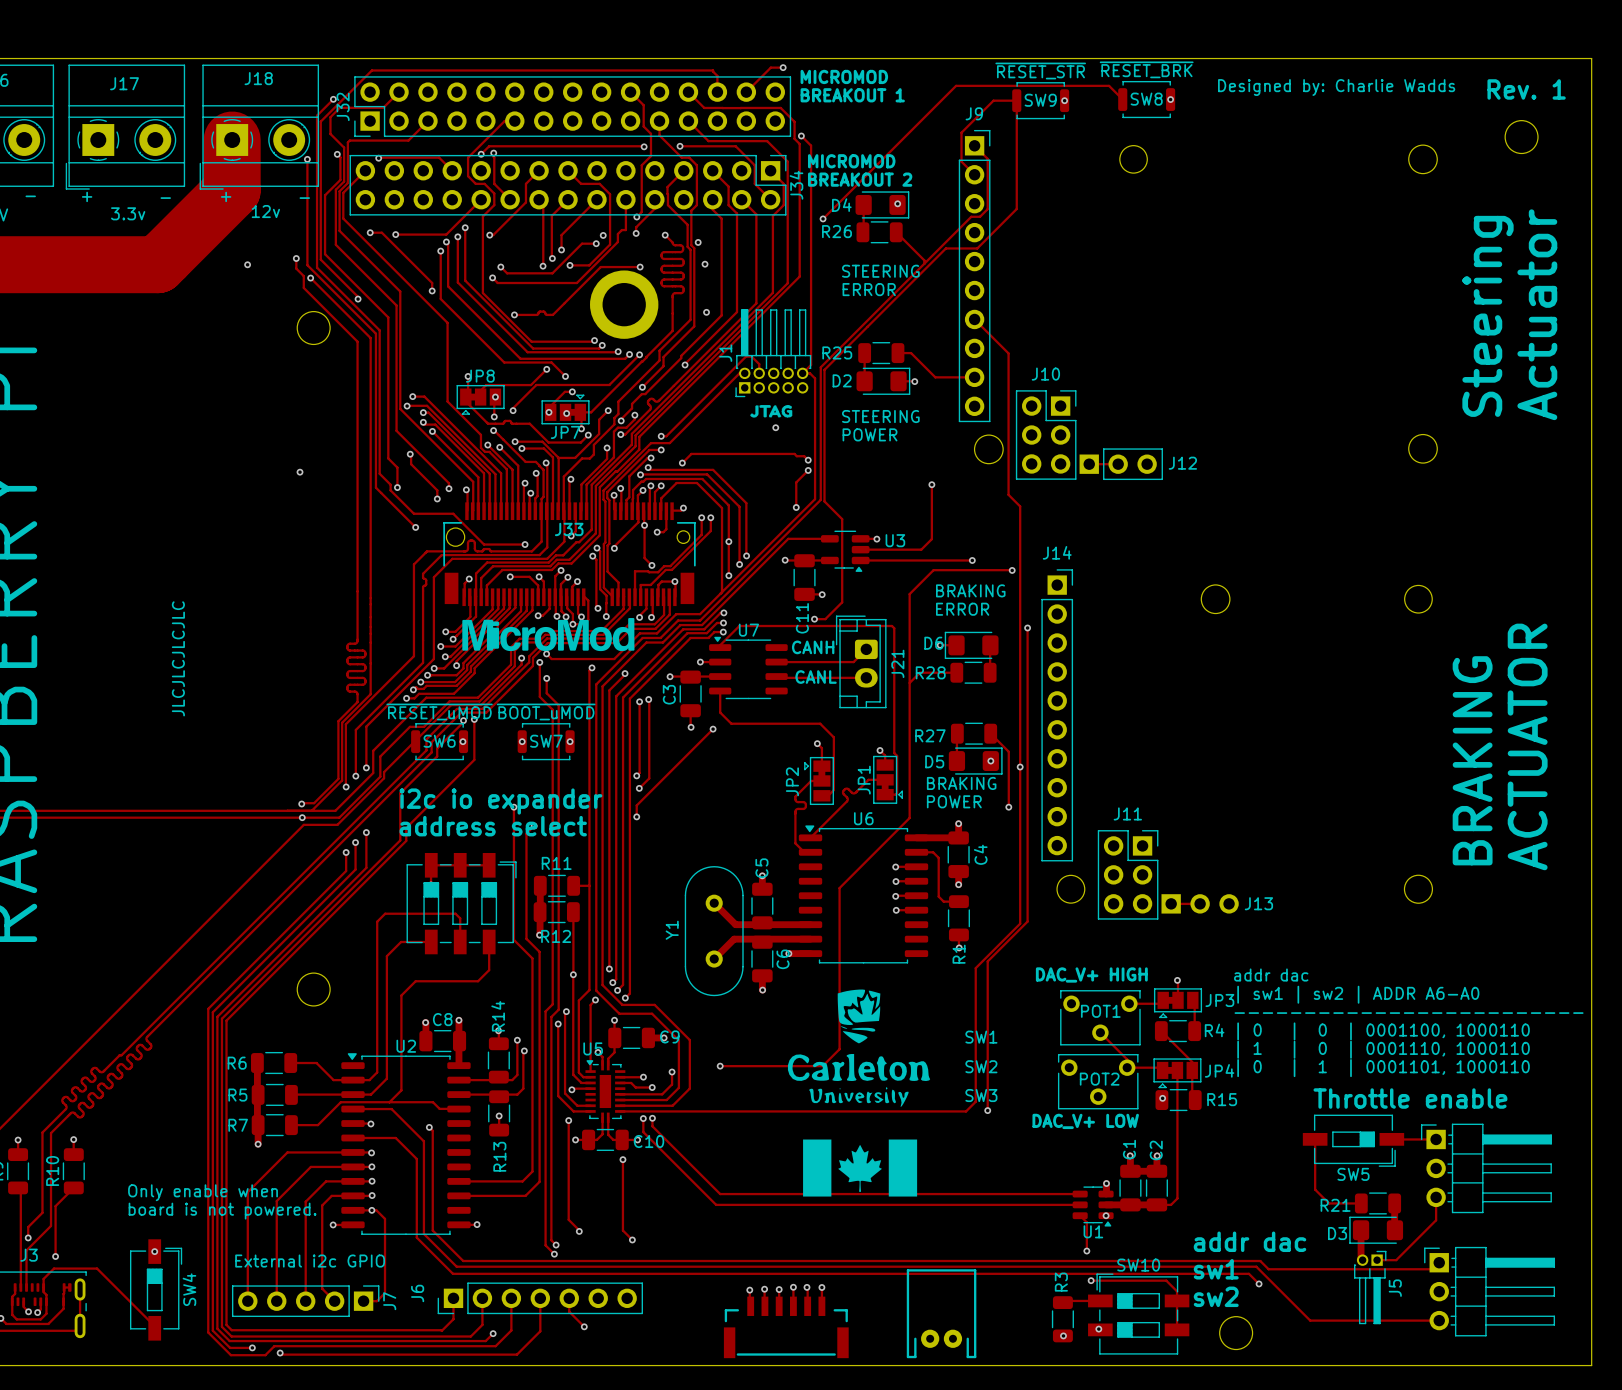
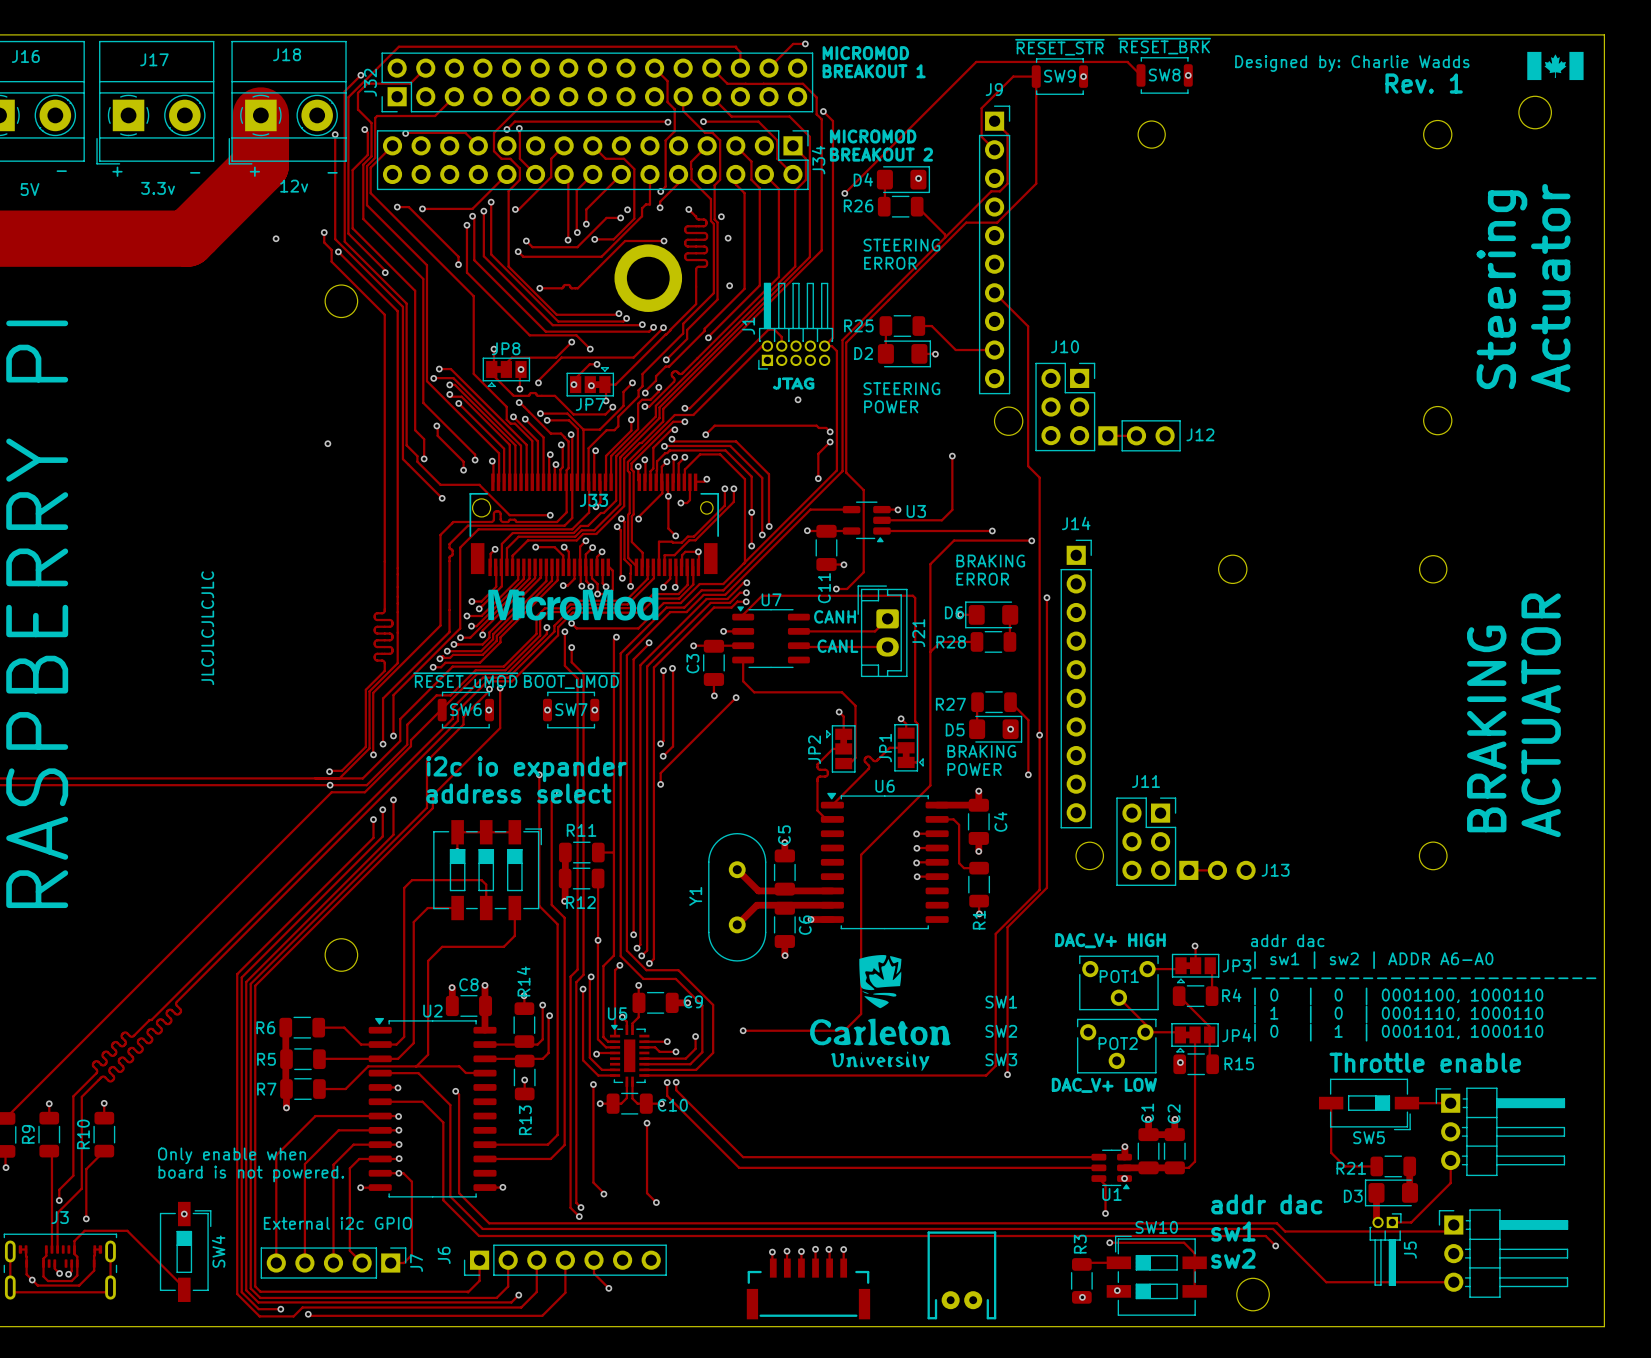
drawing: none -> [1527, 51, 1584, 81]
text position: Rev. 1 (1526, 89) -> Rev. 1 (1424, 83)
drawing: [803, 1139, 918, 1197] -> none

